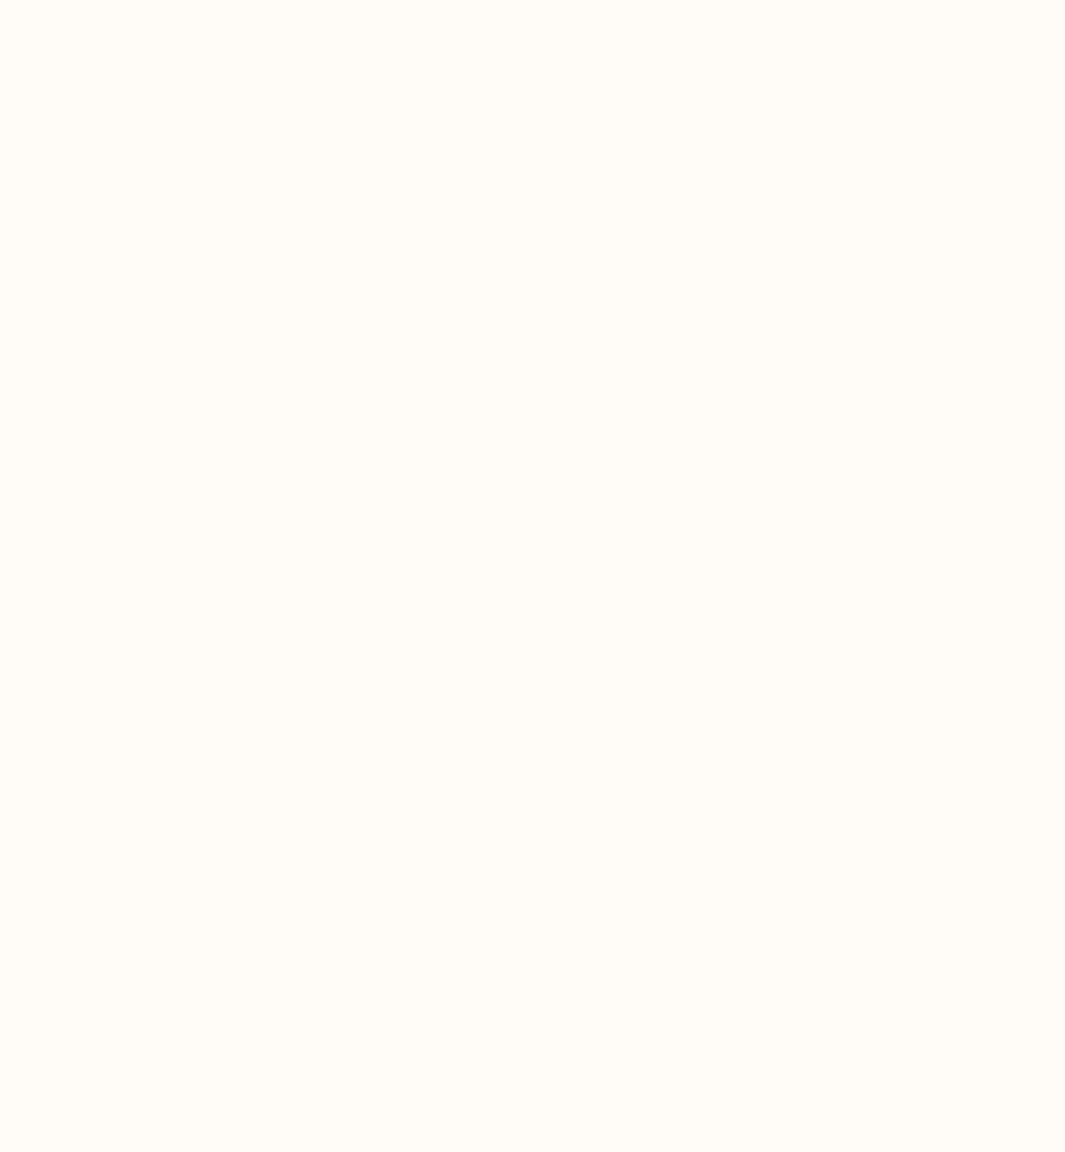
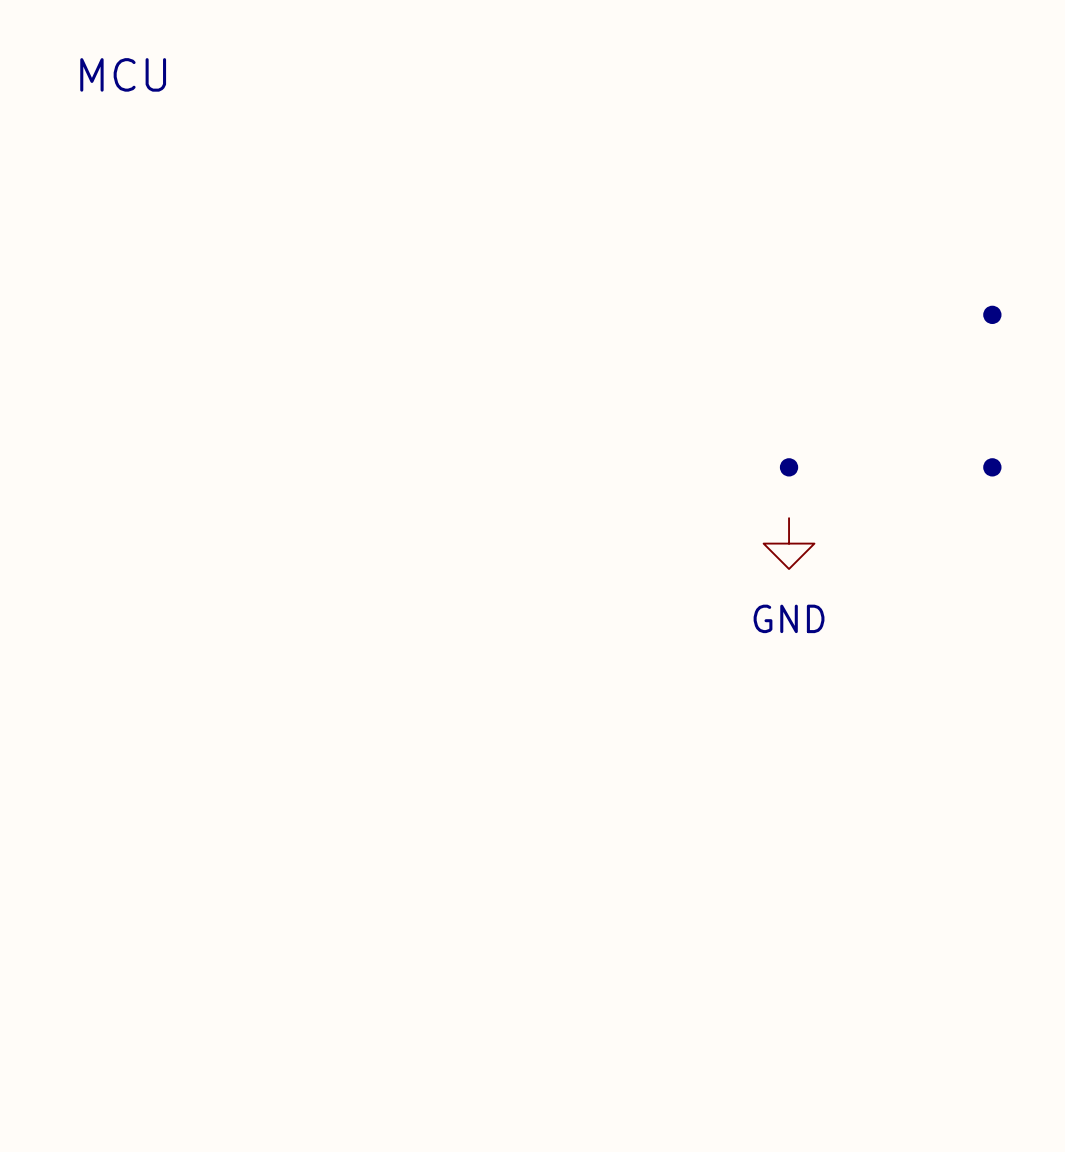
text: none -> MCU (123, 74)
junction: none -> (992, 314)
junction: none -> (789, 467)
junction: none -> (992, 467)
power symbol: none -> GND (789, 543)

